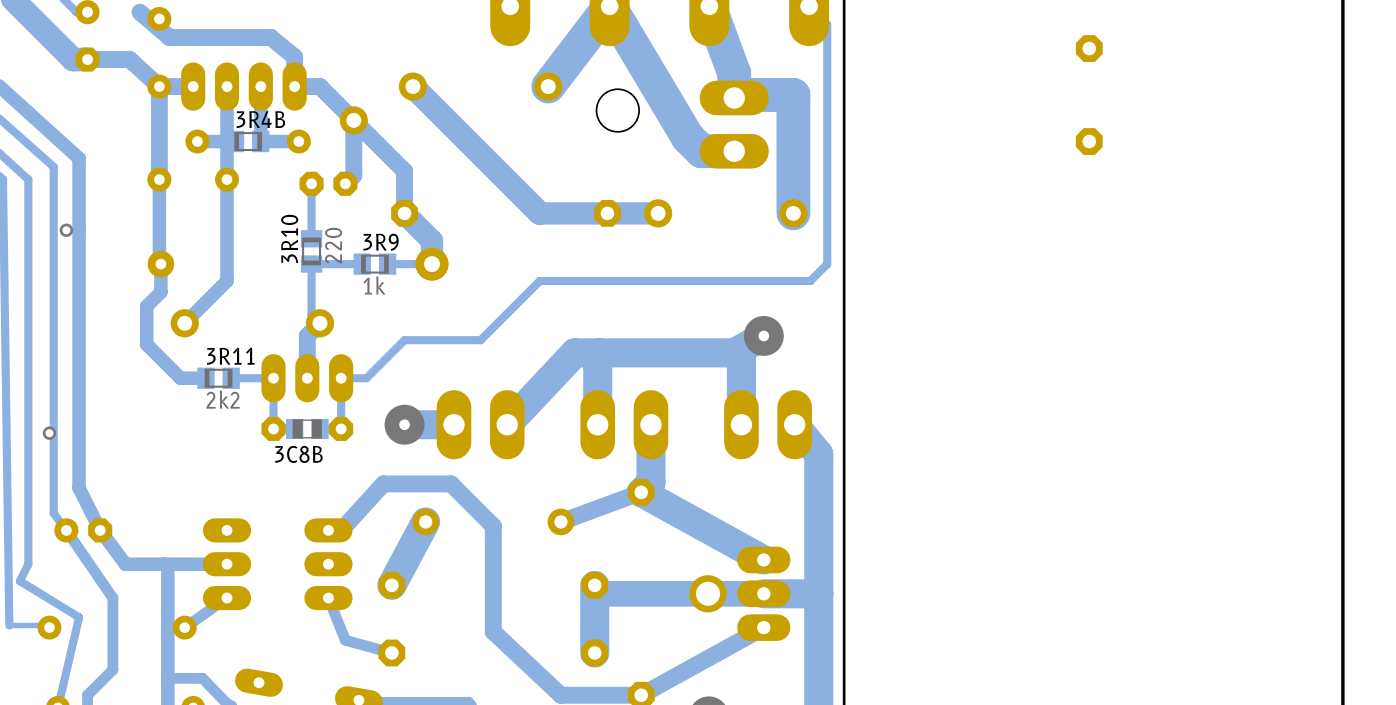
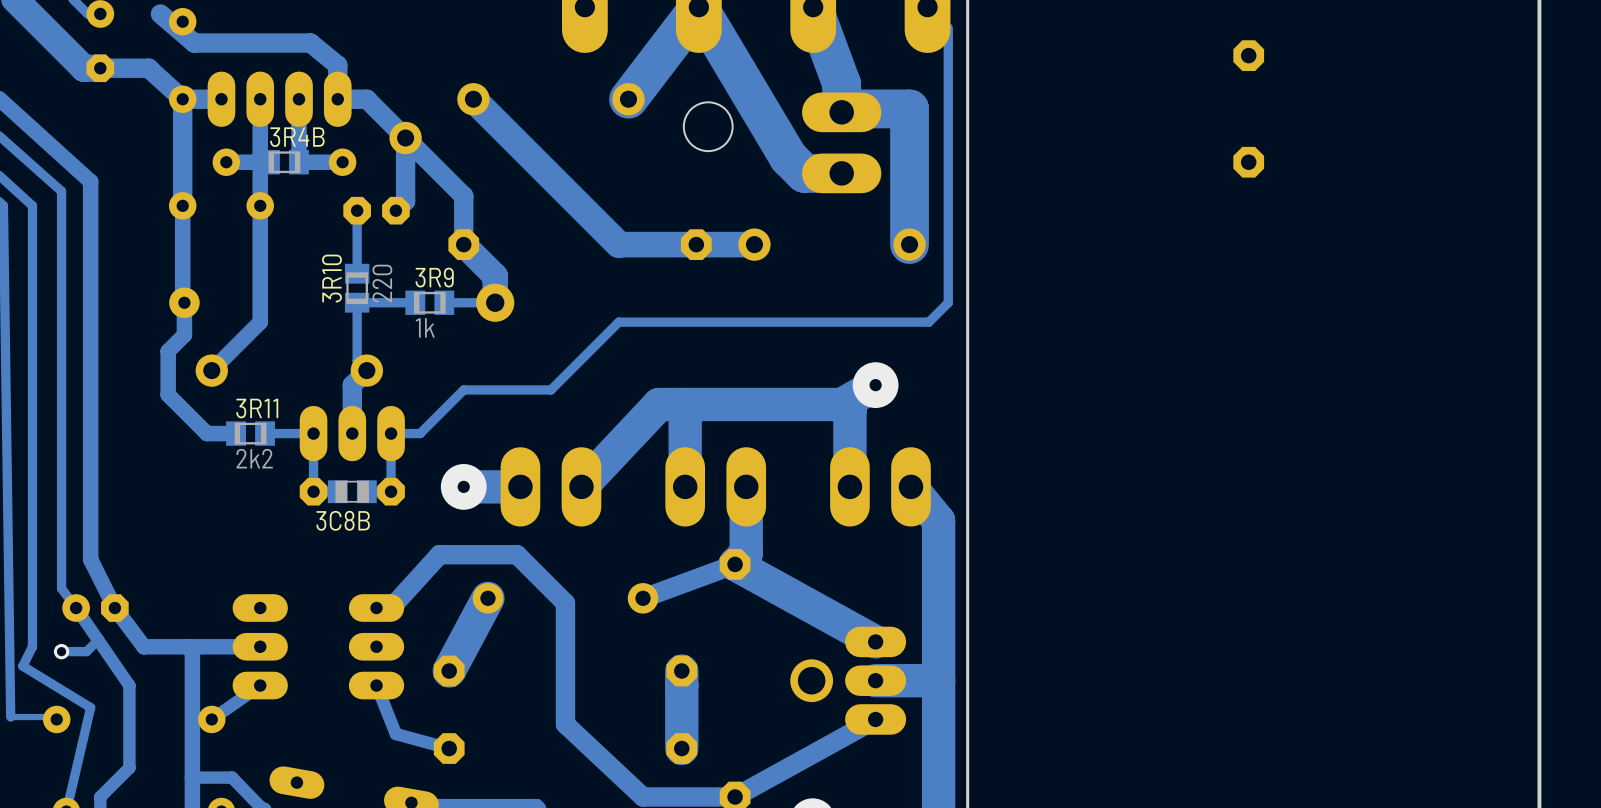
via: (66, 230) -> none
via: (49, 433) -> none
track: none -> (98, 640) (86, 651) (61, 651)
via: none -> (61, 651)
track: (594, 585) (603, 593) (763, 593) -> none

